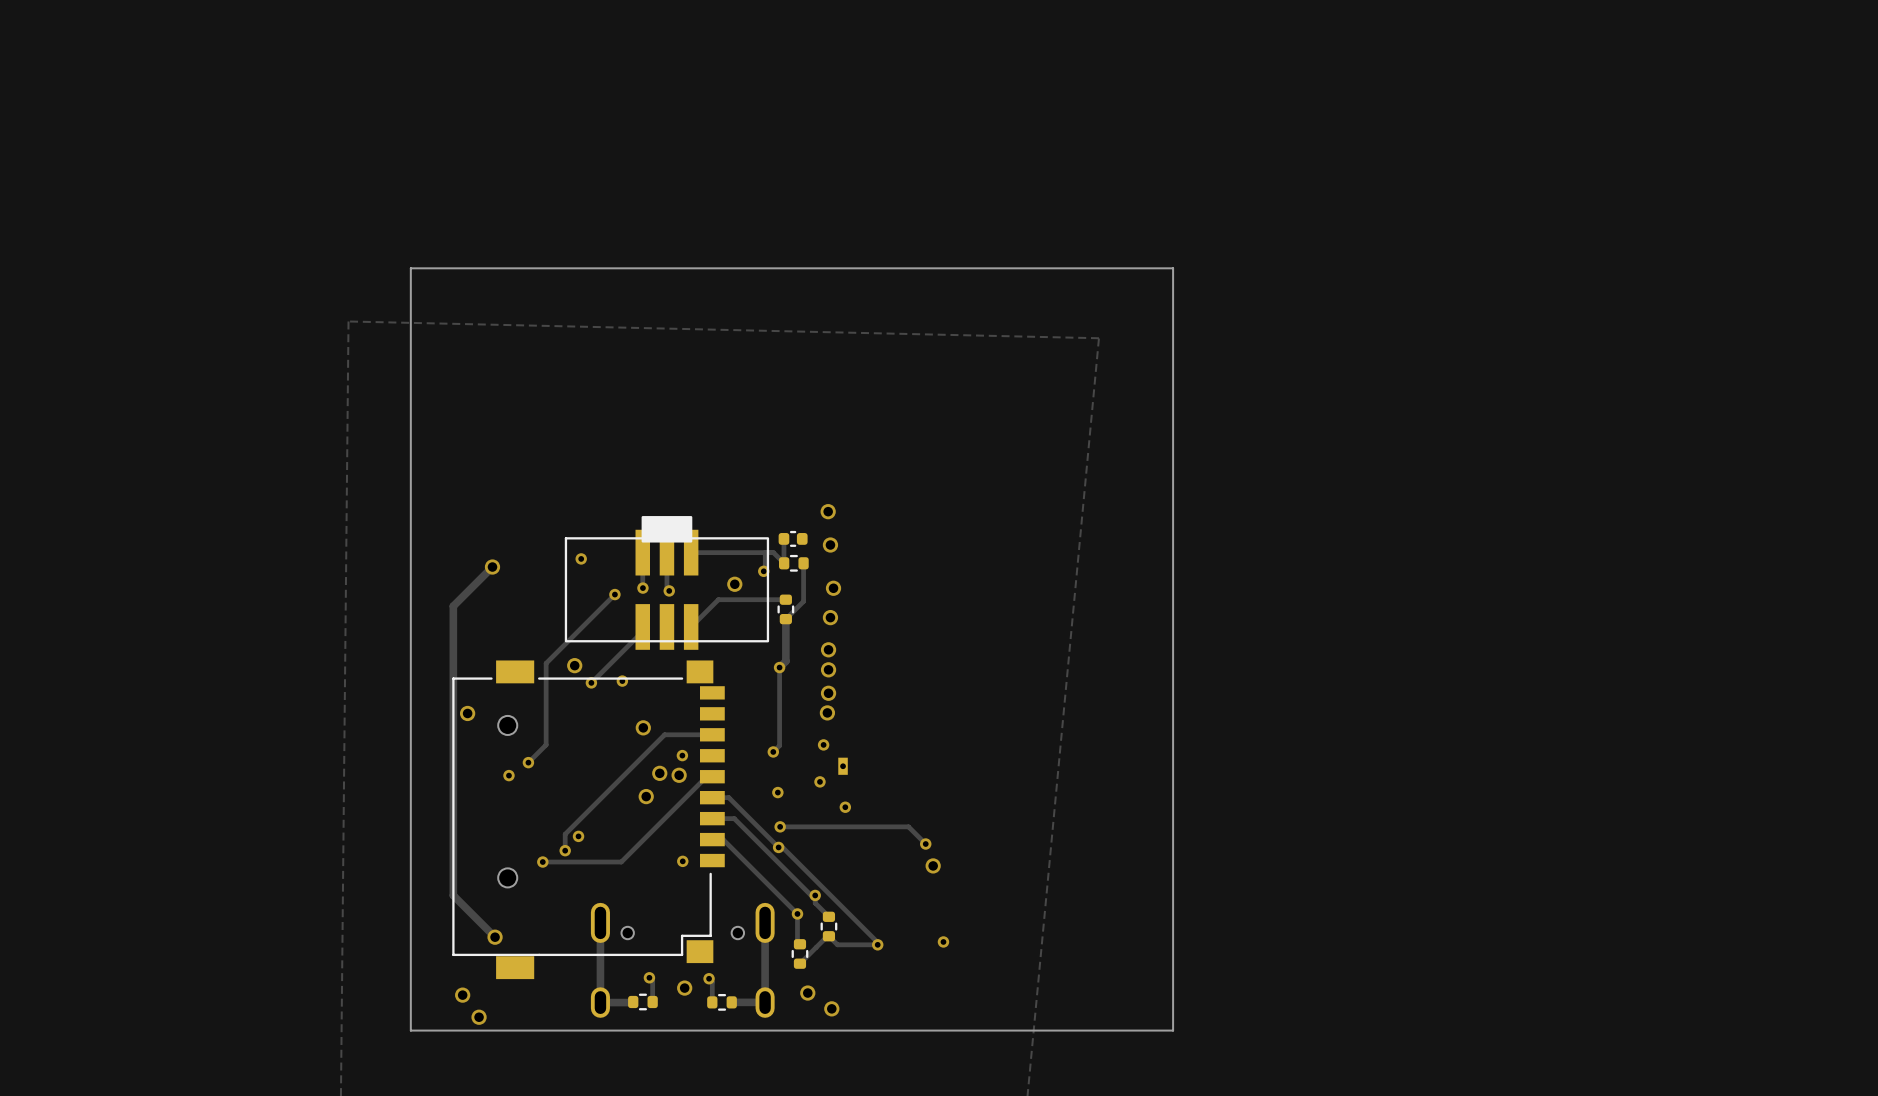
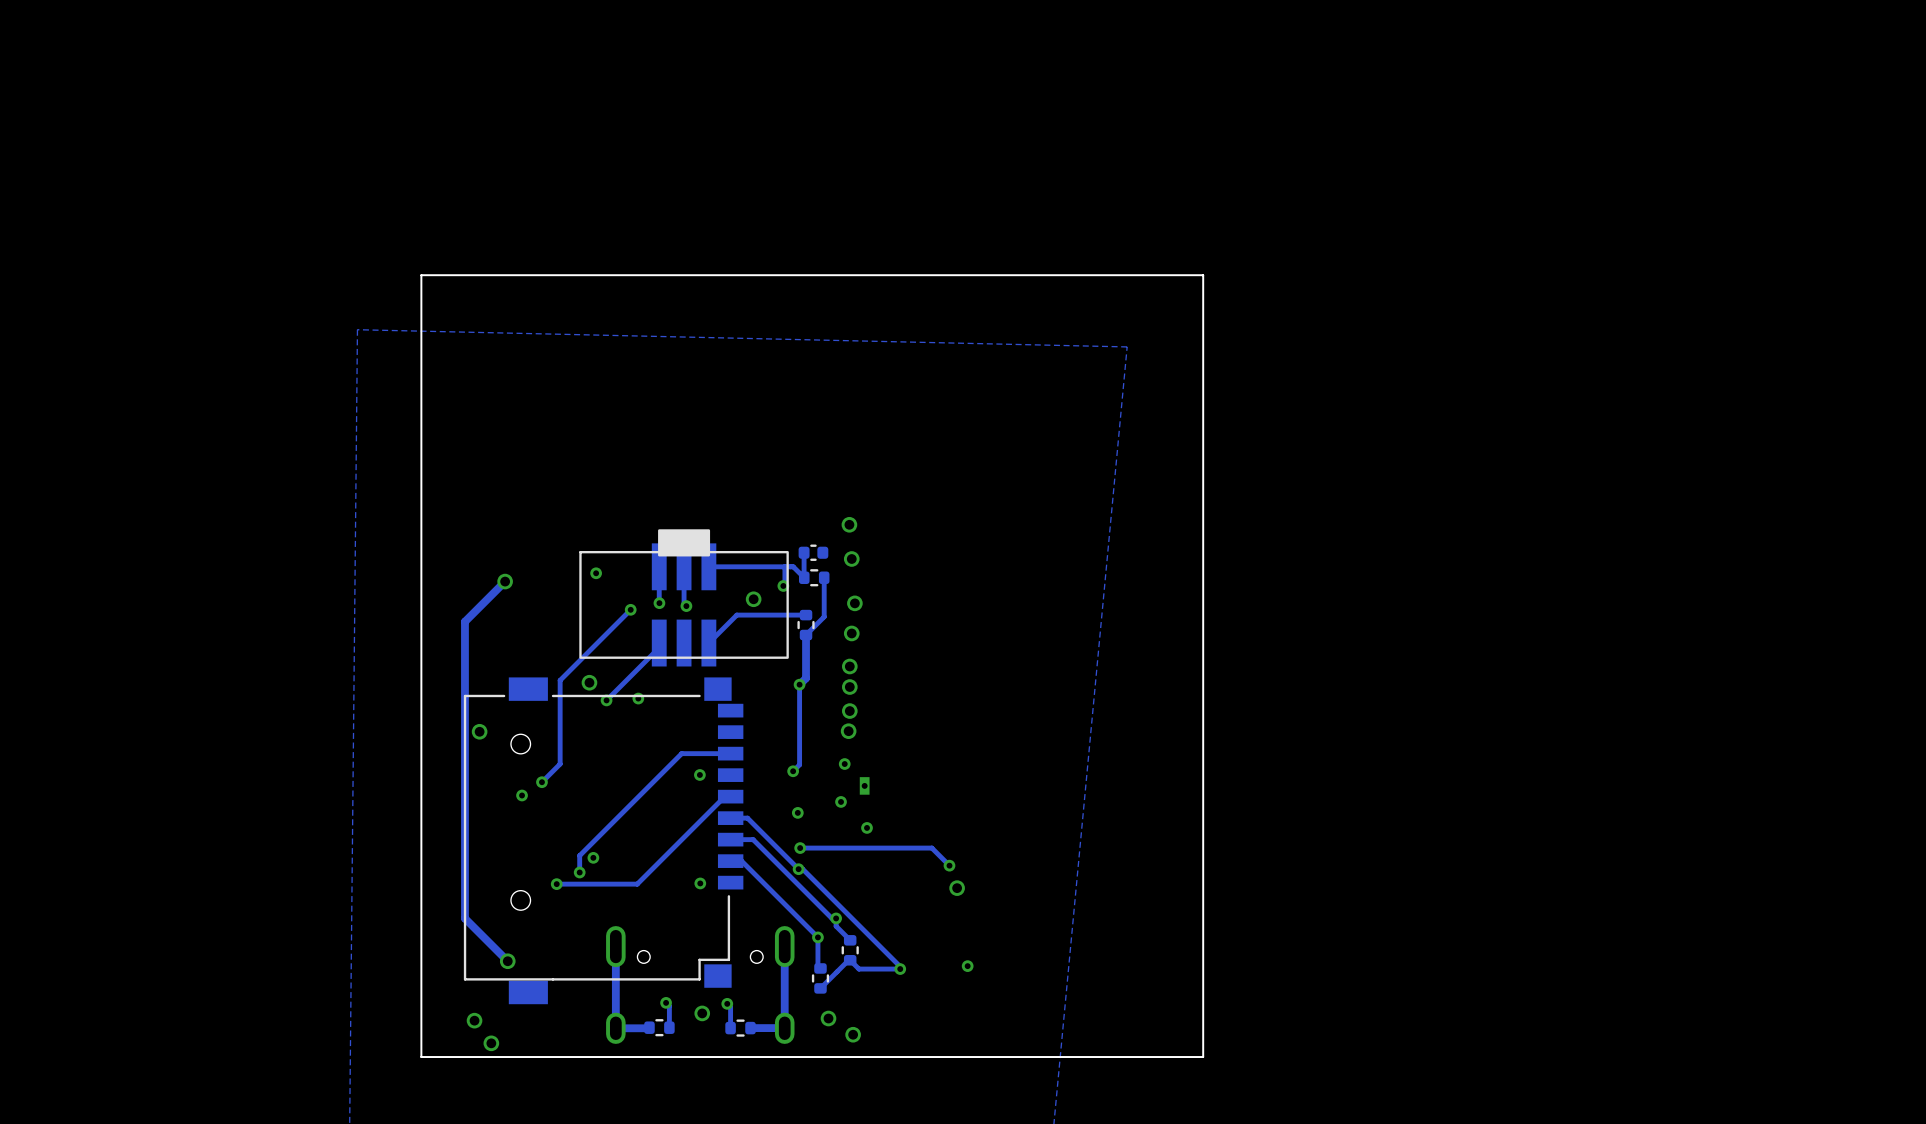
via: (643, 727) -> none
via: (659, 773) -> none
via: (679, 775) -> none
via: (646, 796) -> none

